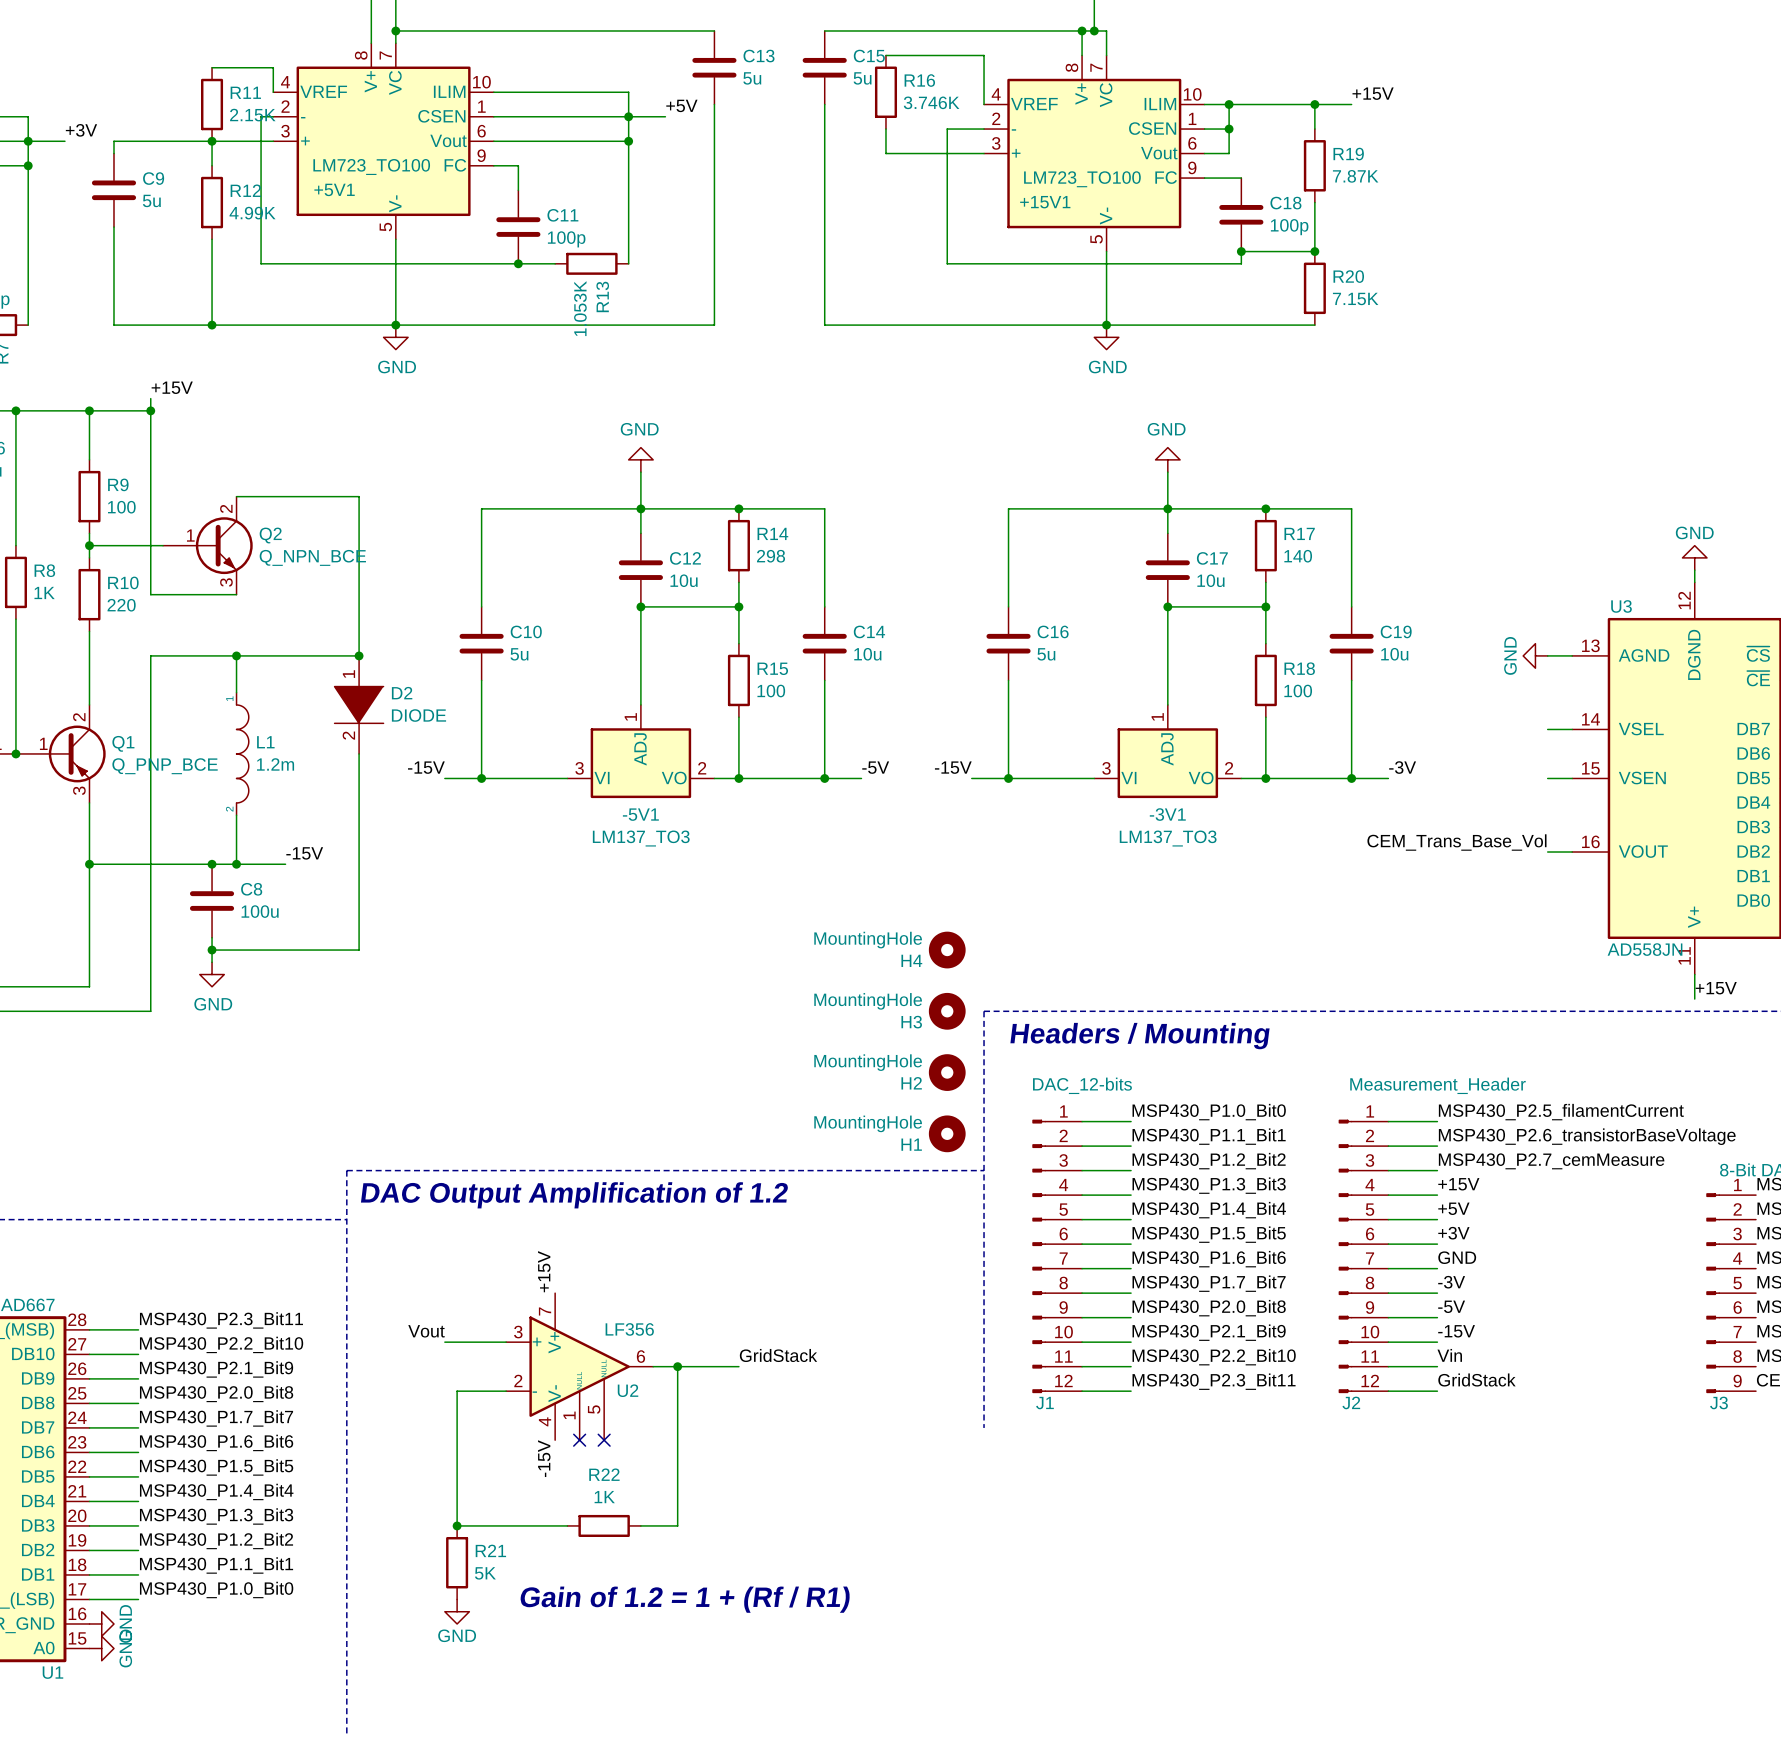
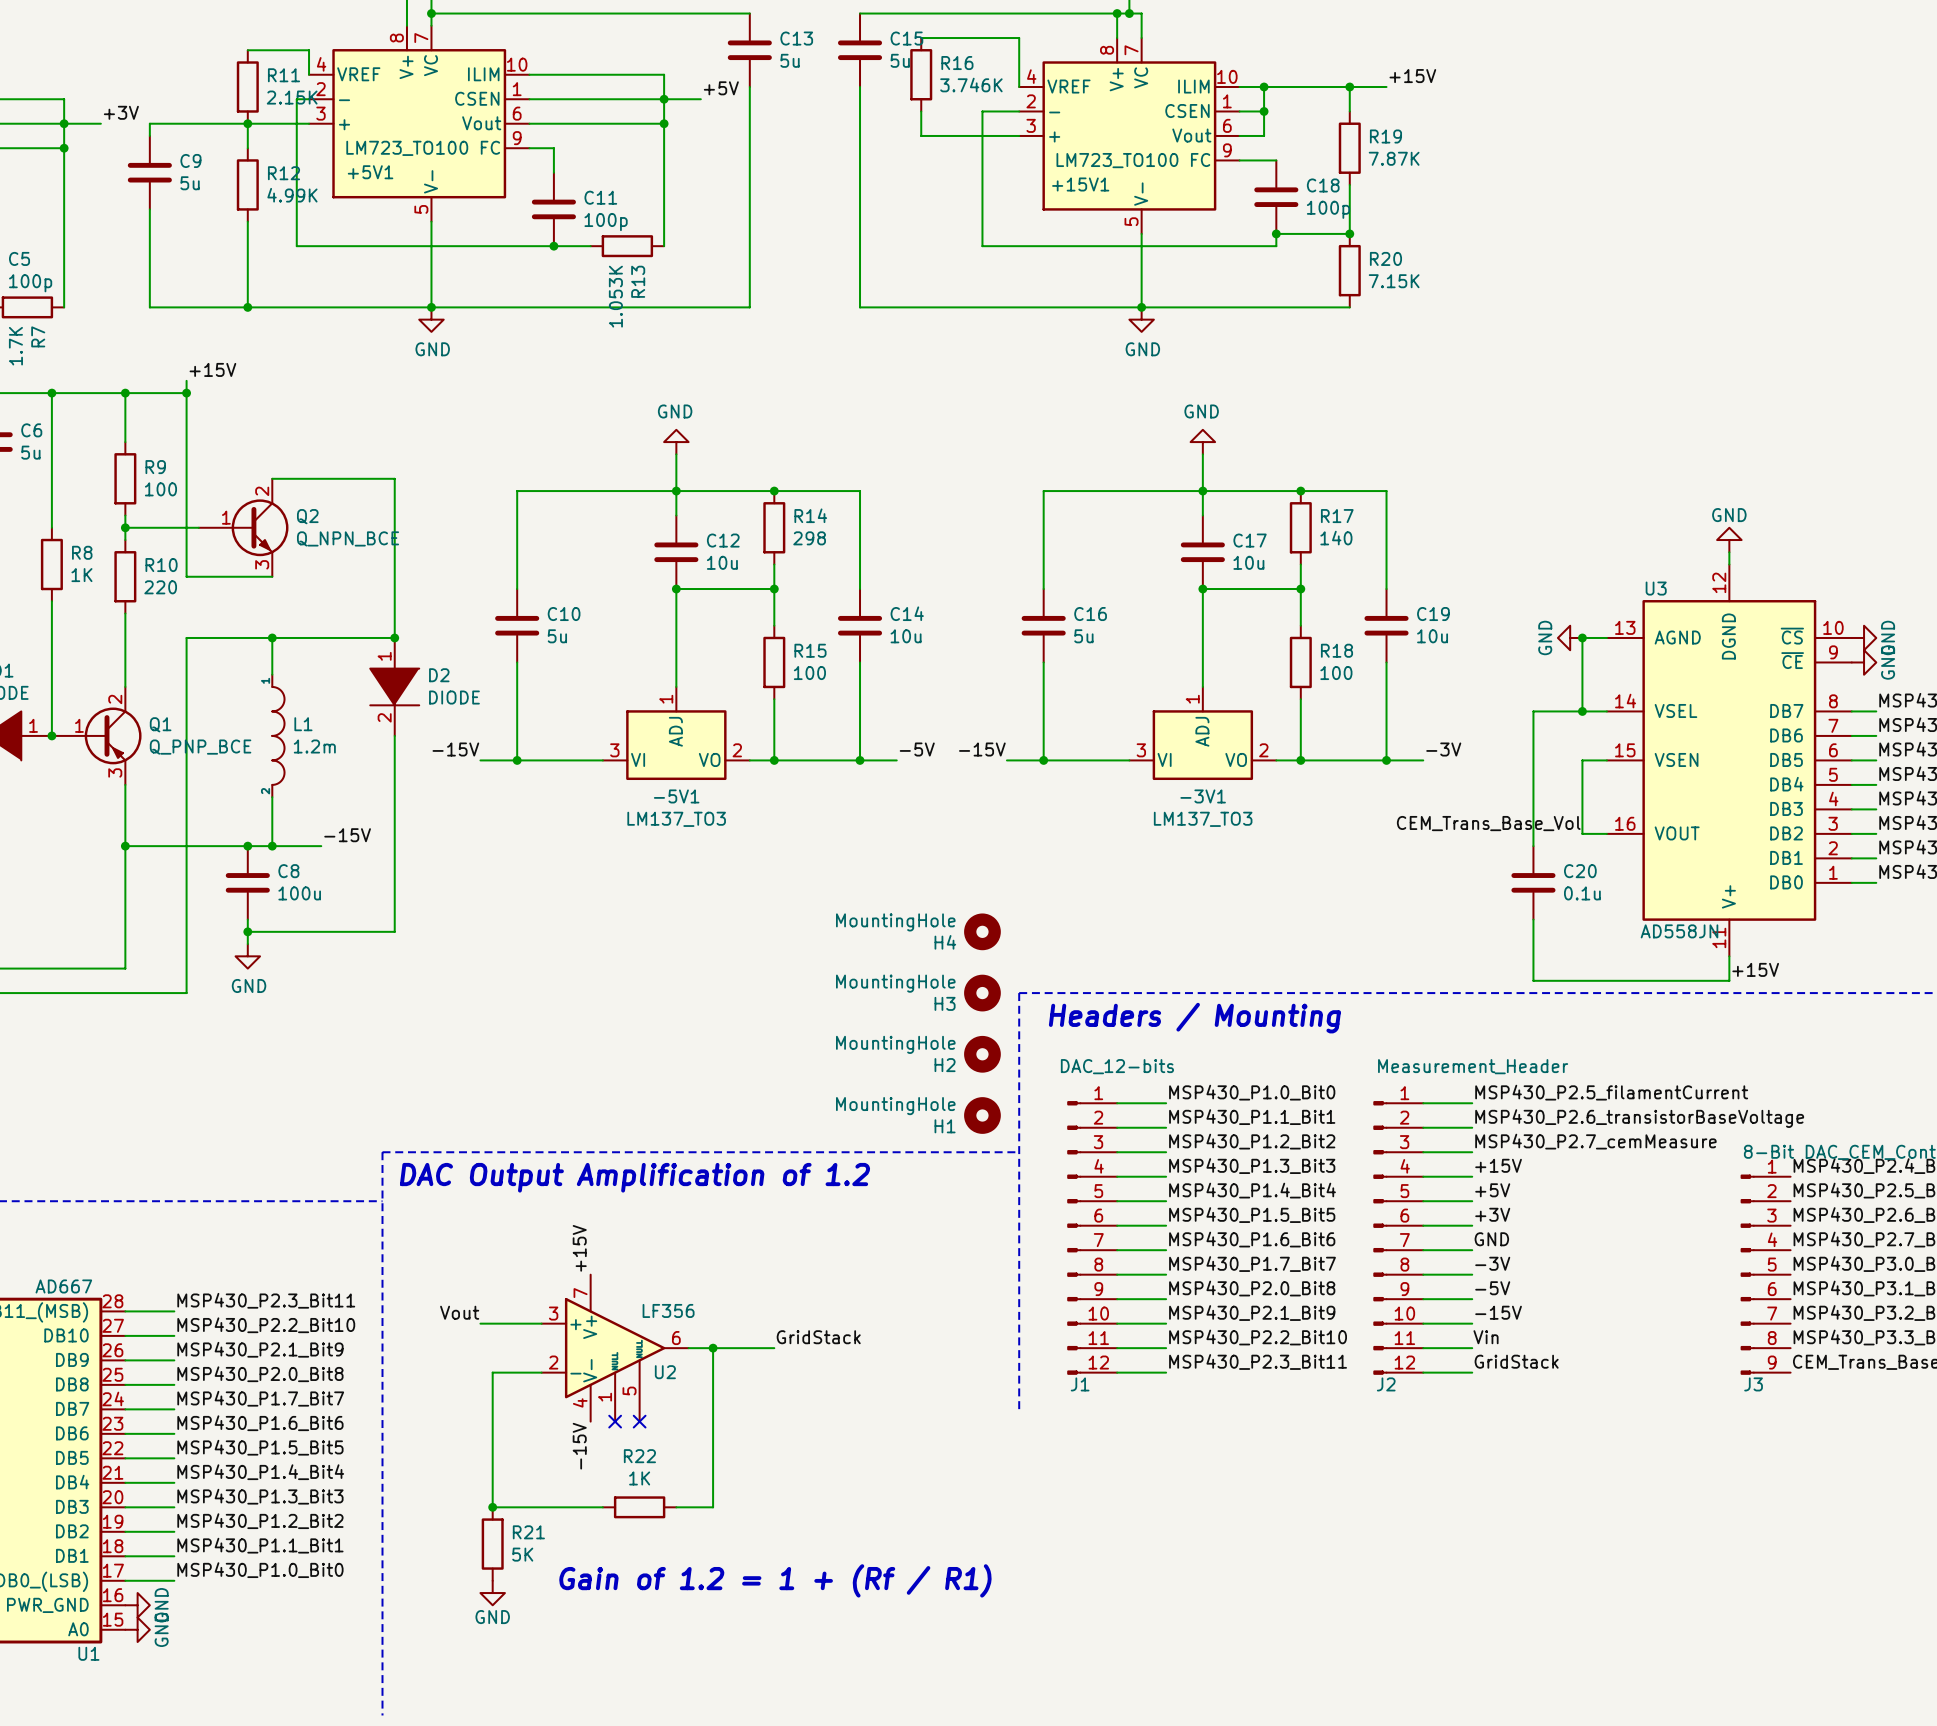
wire: none -> (1582, 637) (1582, 711) (1533, 711) (1533, 846)
junction: none -> (1582, 637)
junction: none -> (1582, 711)
wire: none -> (1582, 760) (1582, 833)
C20: none -> 0.1u (1533, 882)
wire: none -> (1533, 919) (1533, 980) (1729, 980)

